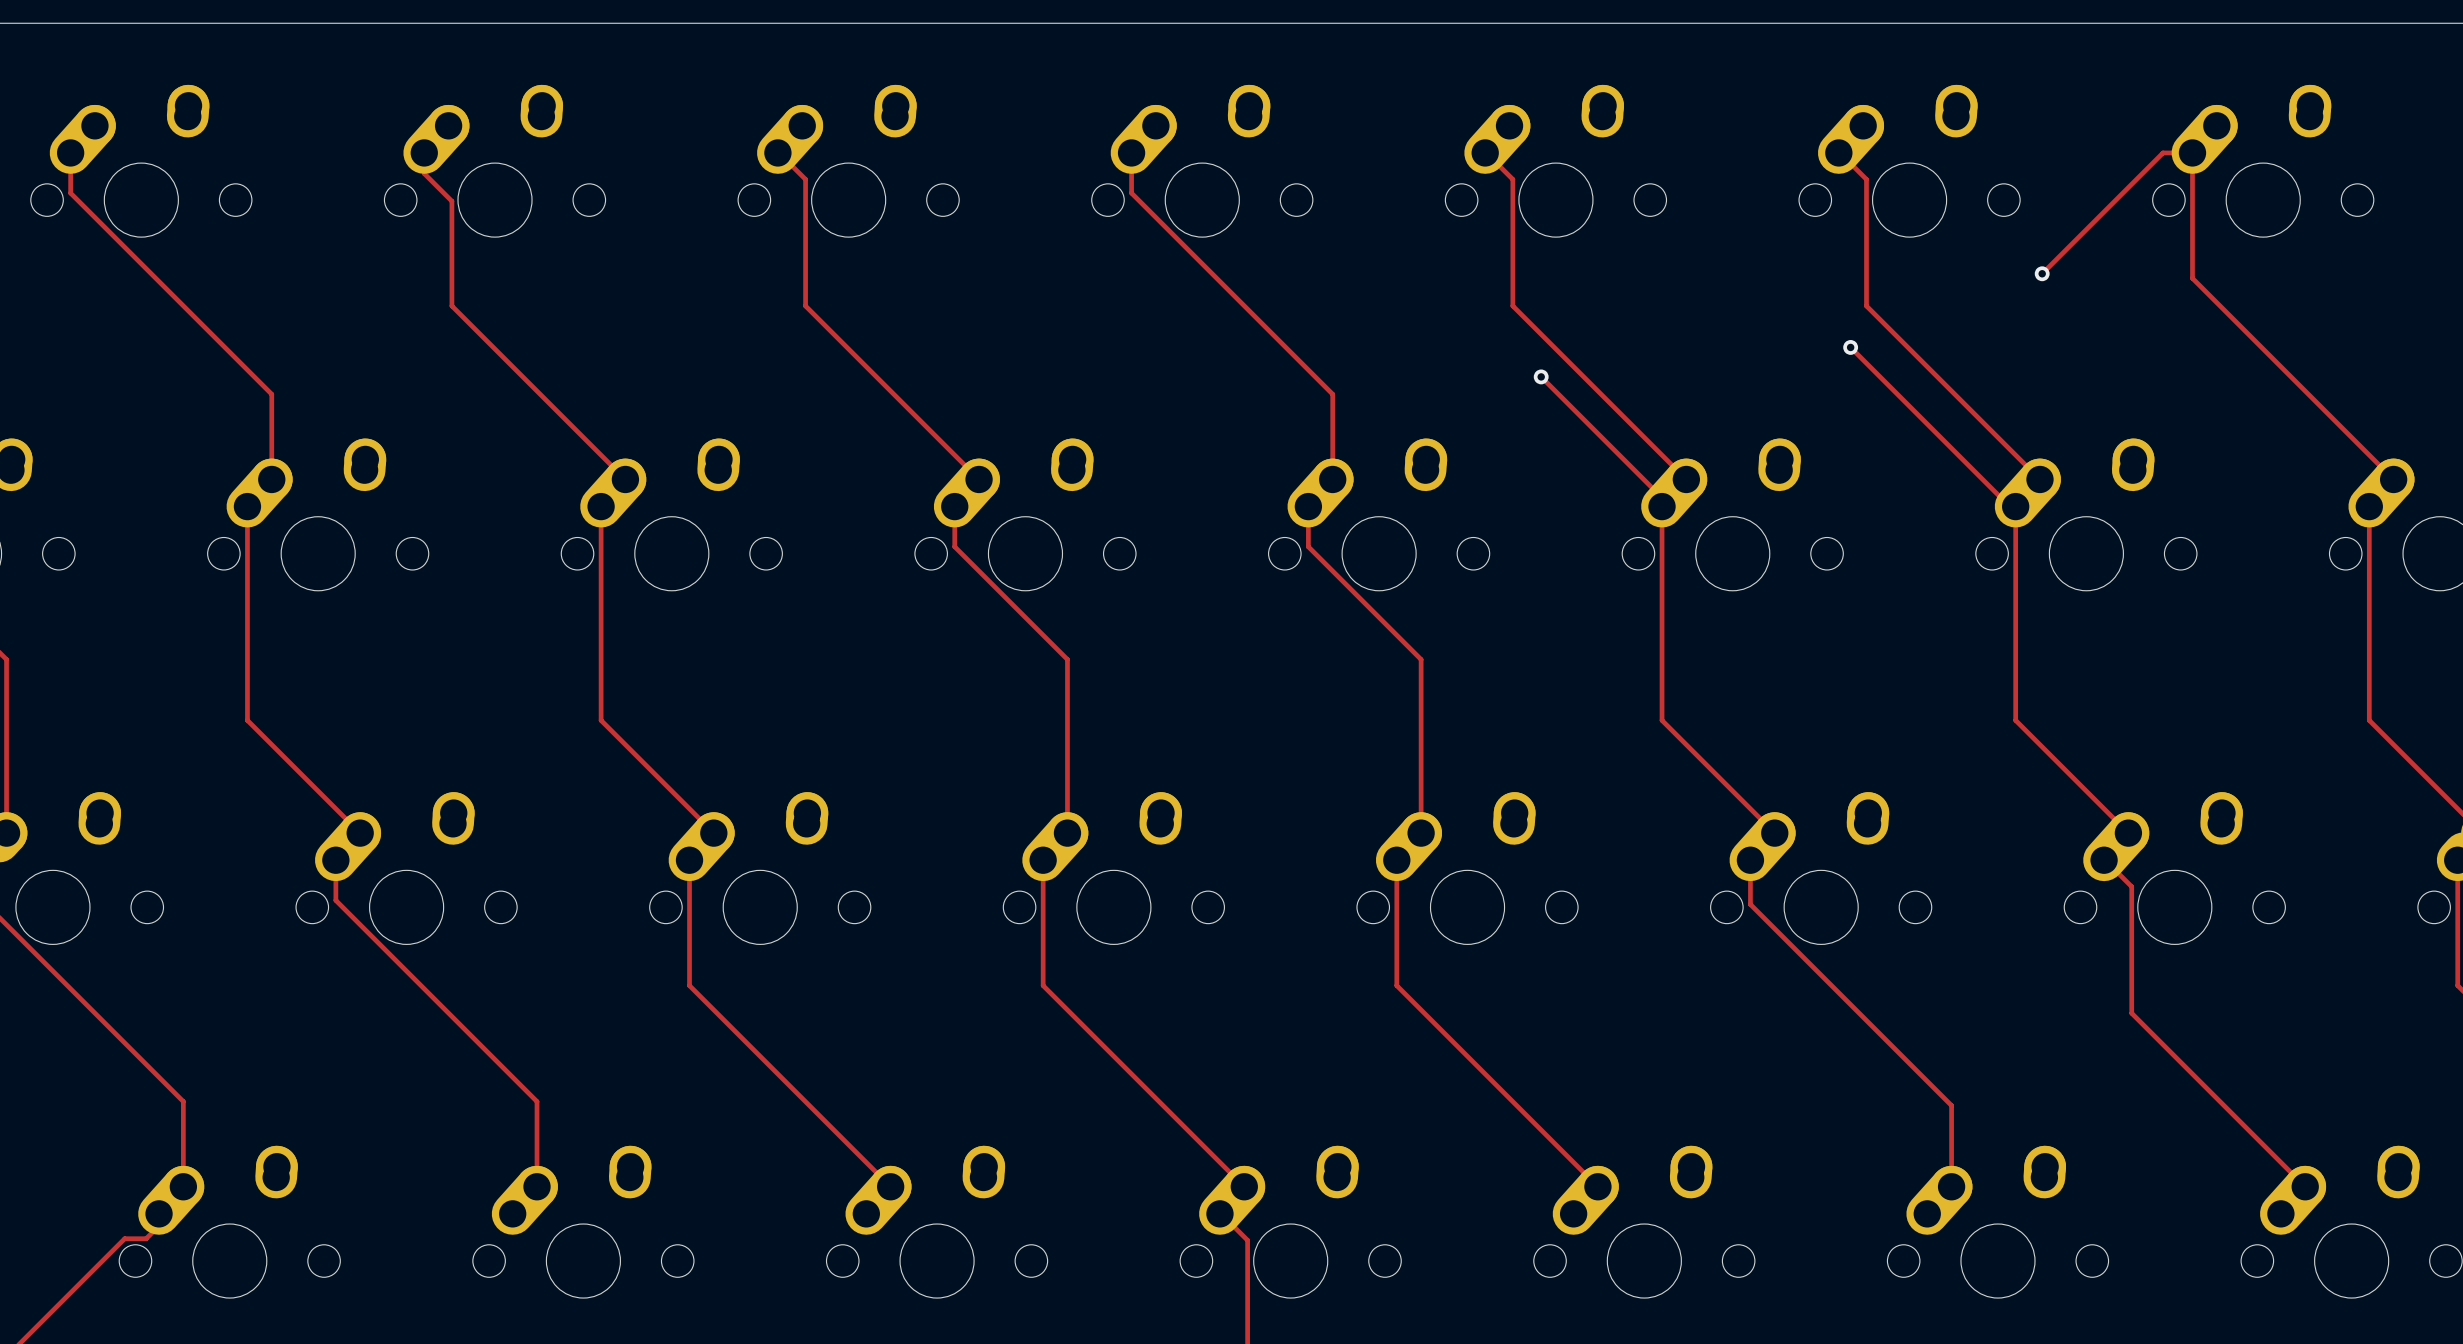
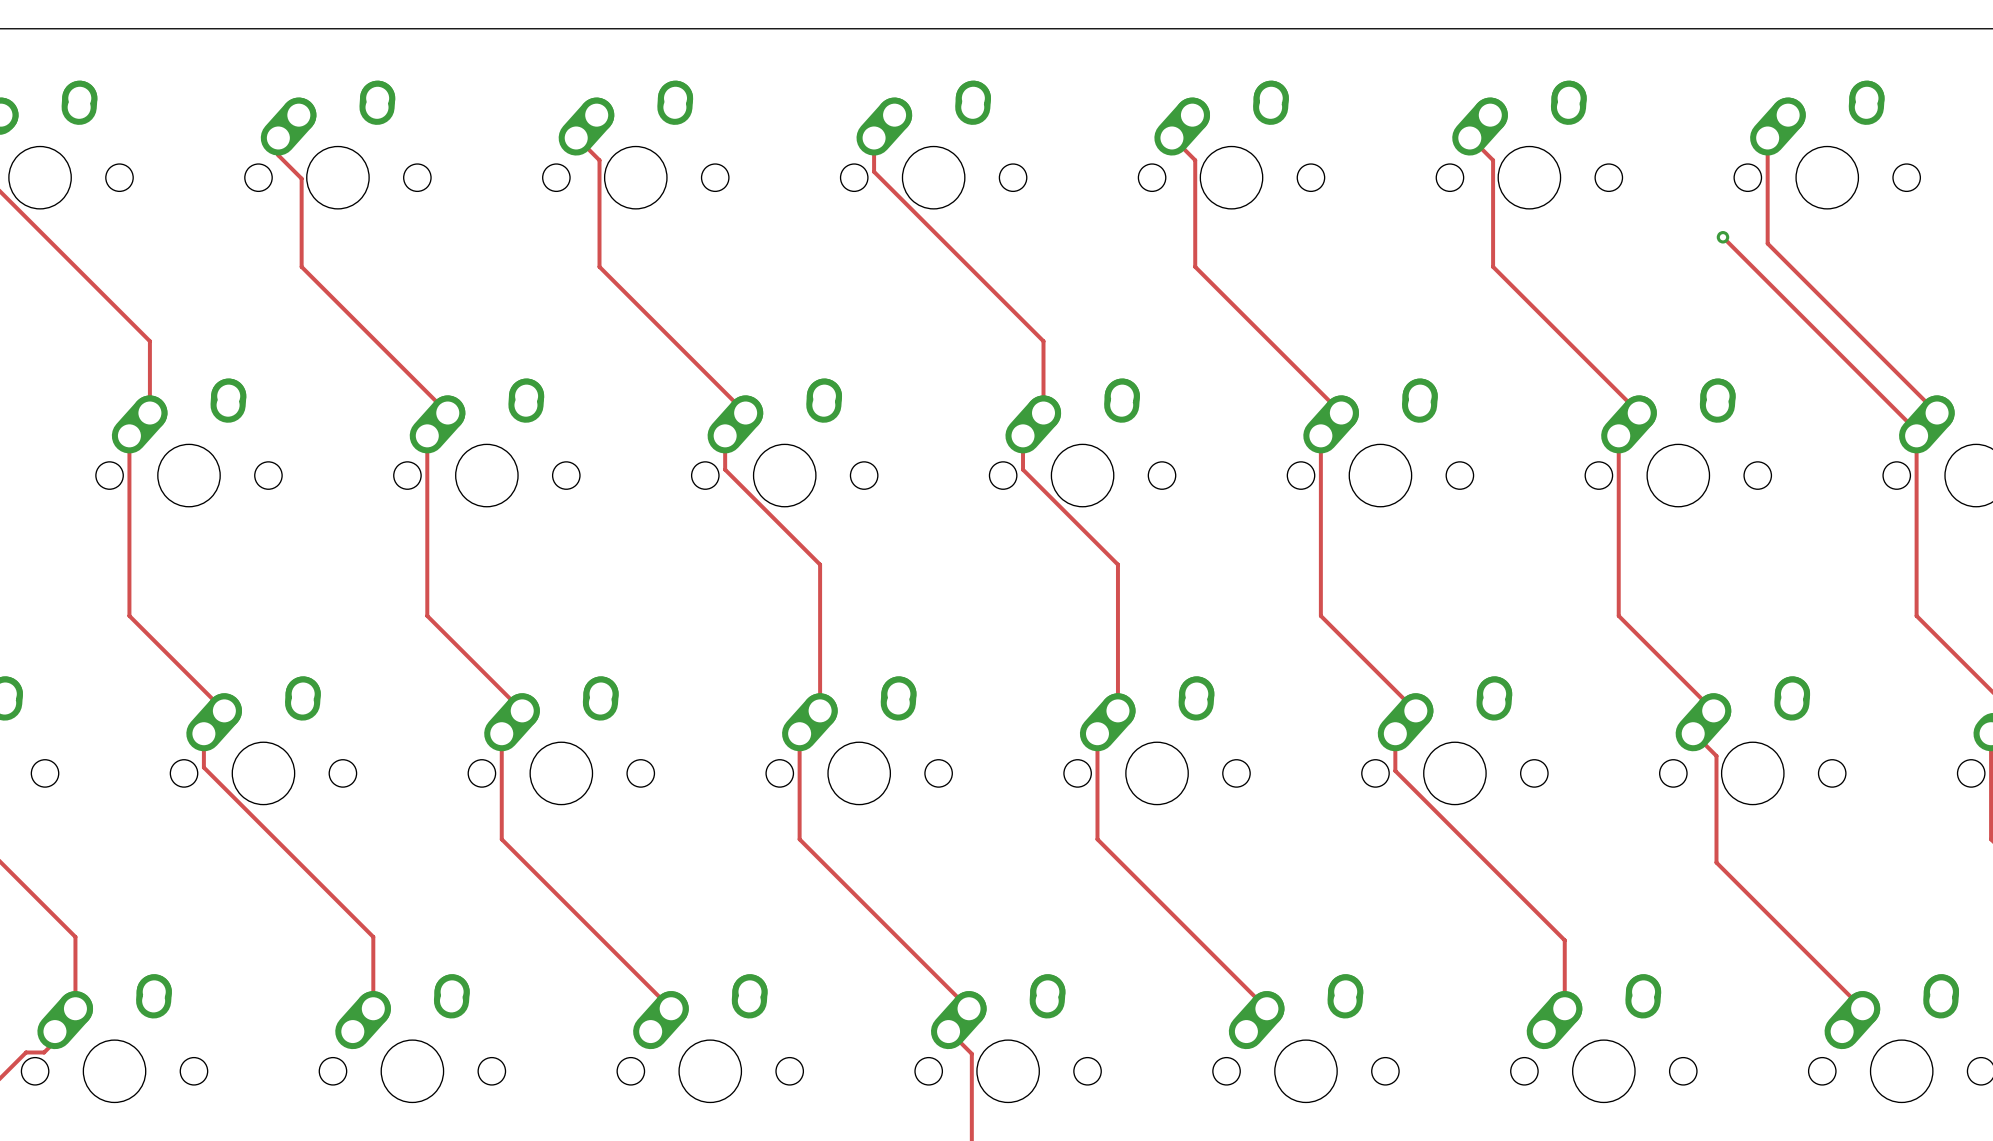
track: (2192, 152) (2163, 152) (2042, 273) -> none
track: none -> (1722, 237) (1921, 435)
via position: (2042, 273) -> (1722, 237)
track: (1850, 347) (2009, 506) (2015, 506) -> none
via: (1850, 347) -> none
track: (1541, 376) (1662, 497) (1662, 506) -> none
via: (1541, 376) -> none

